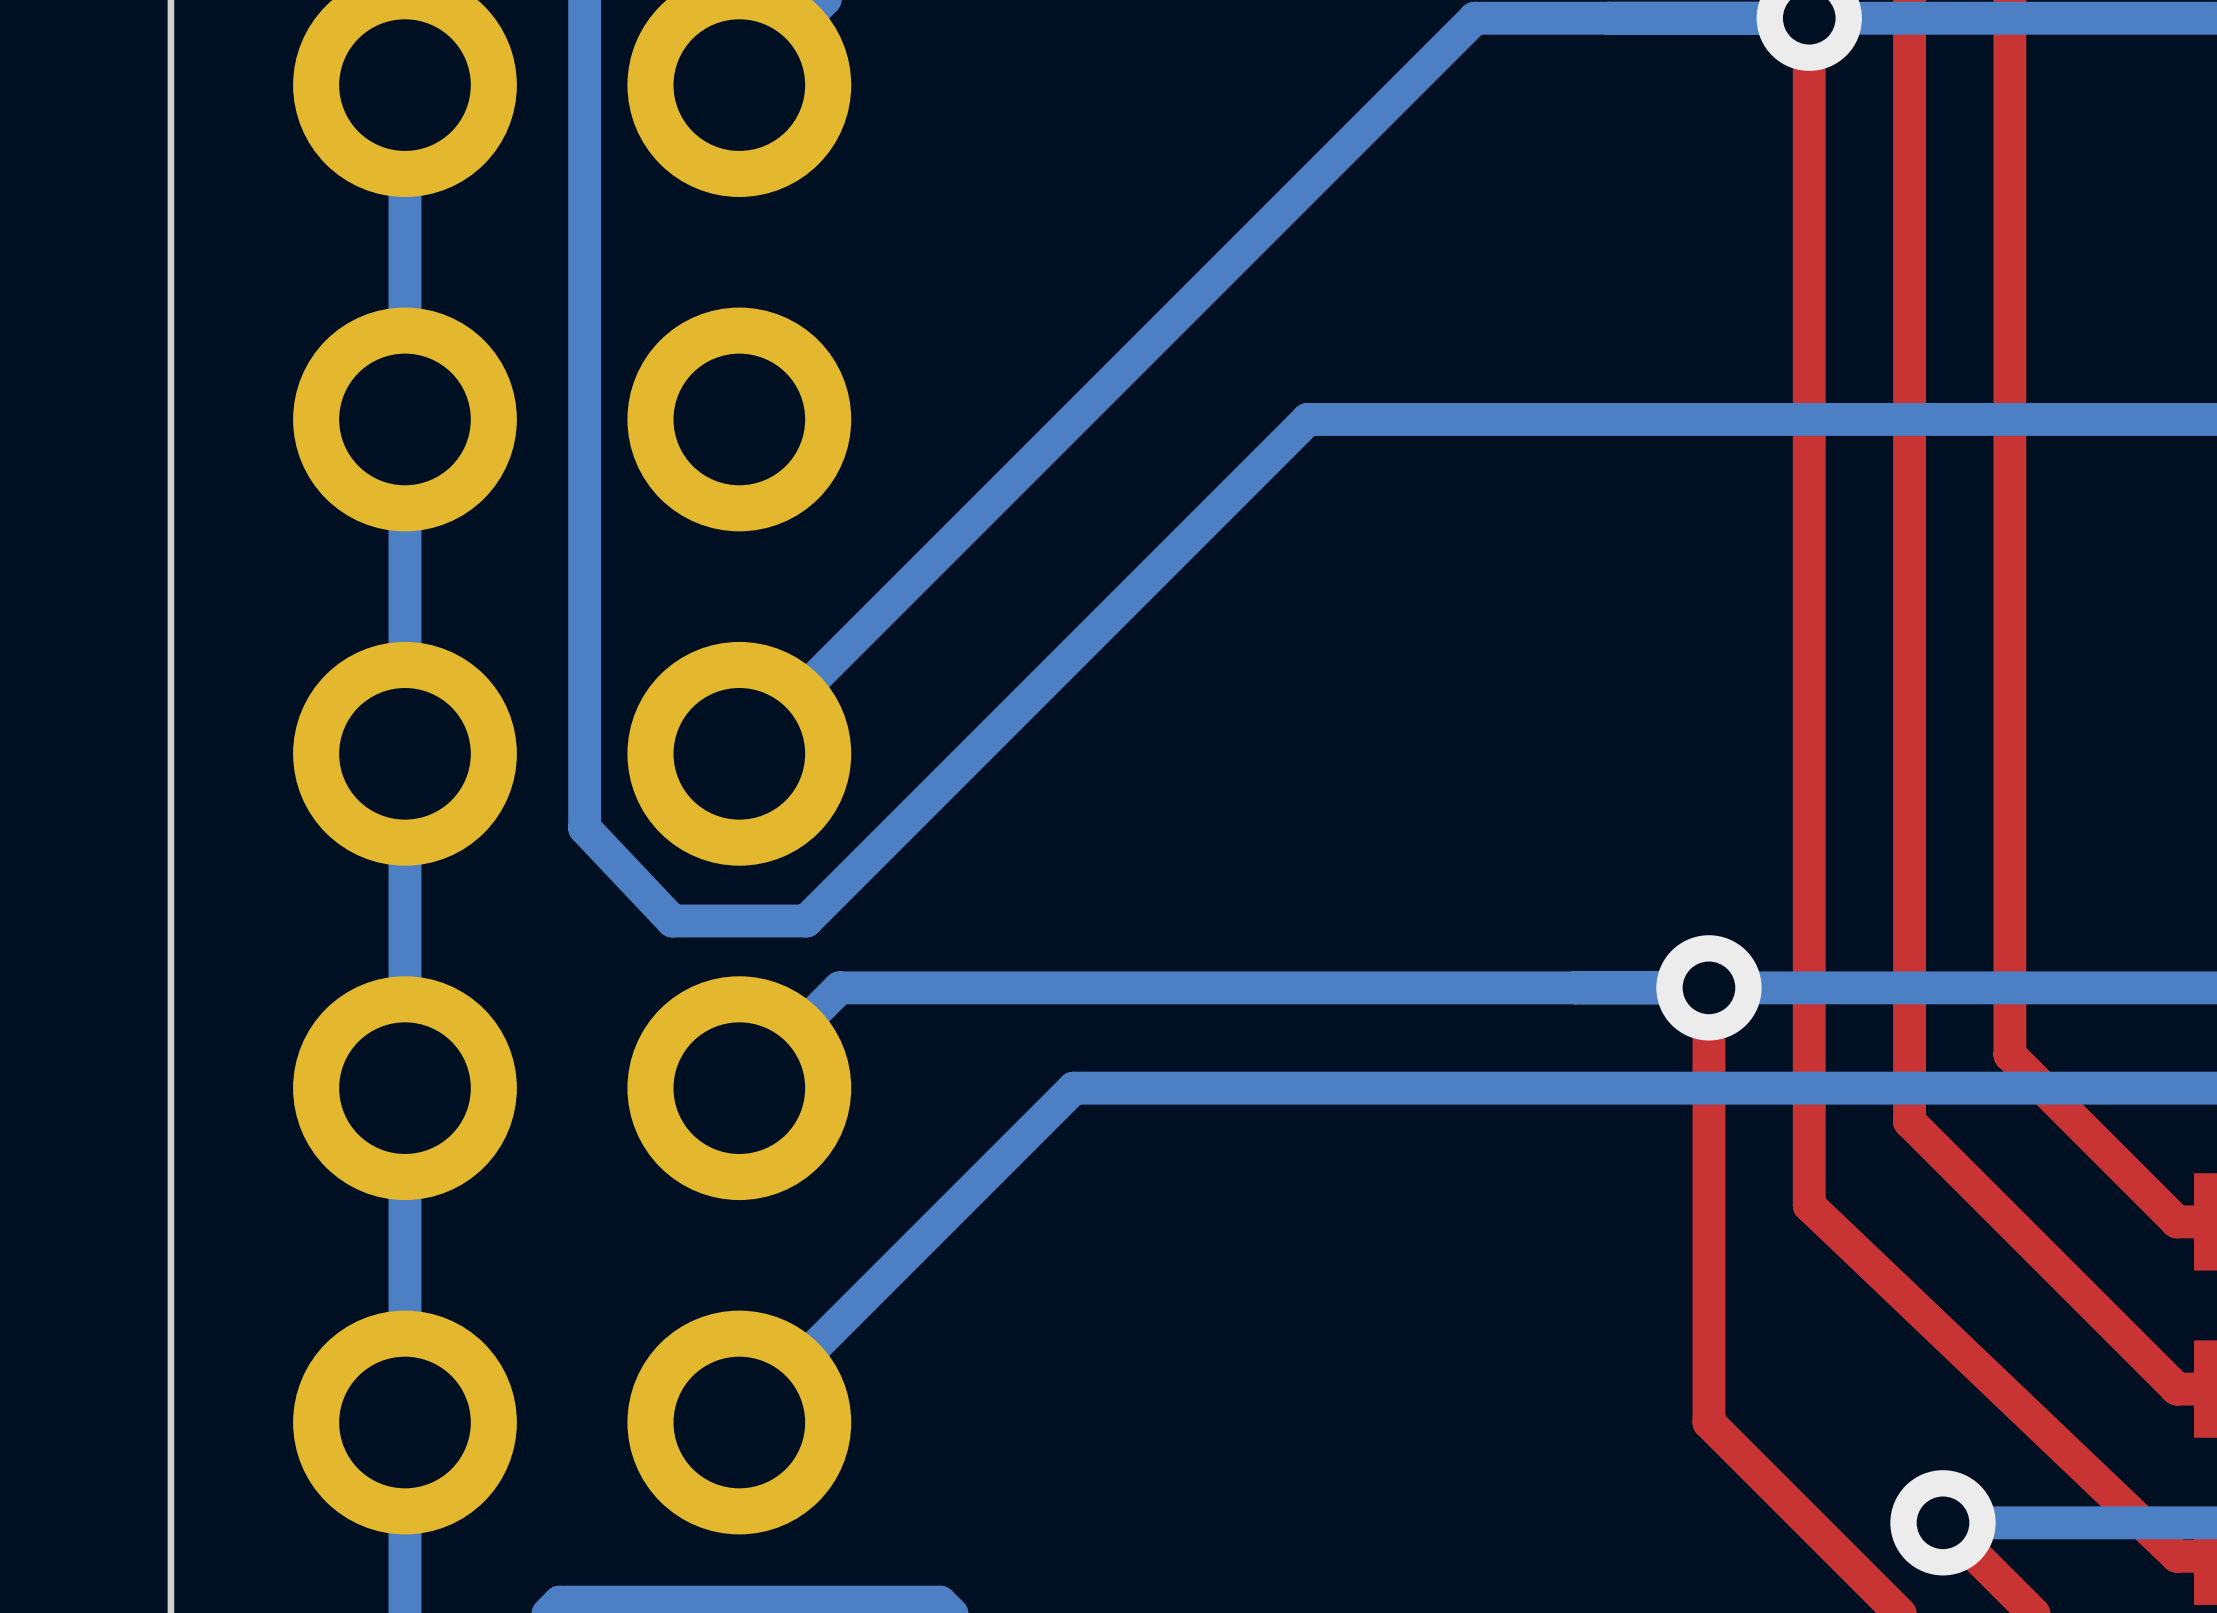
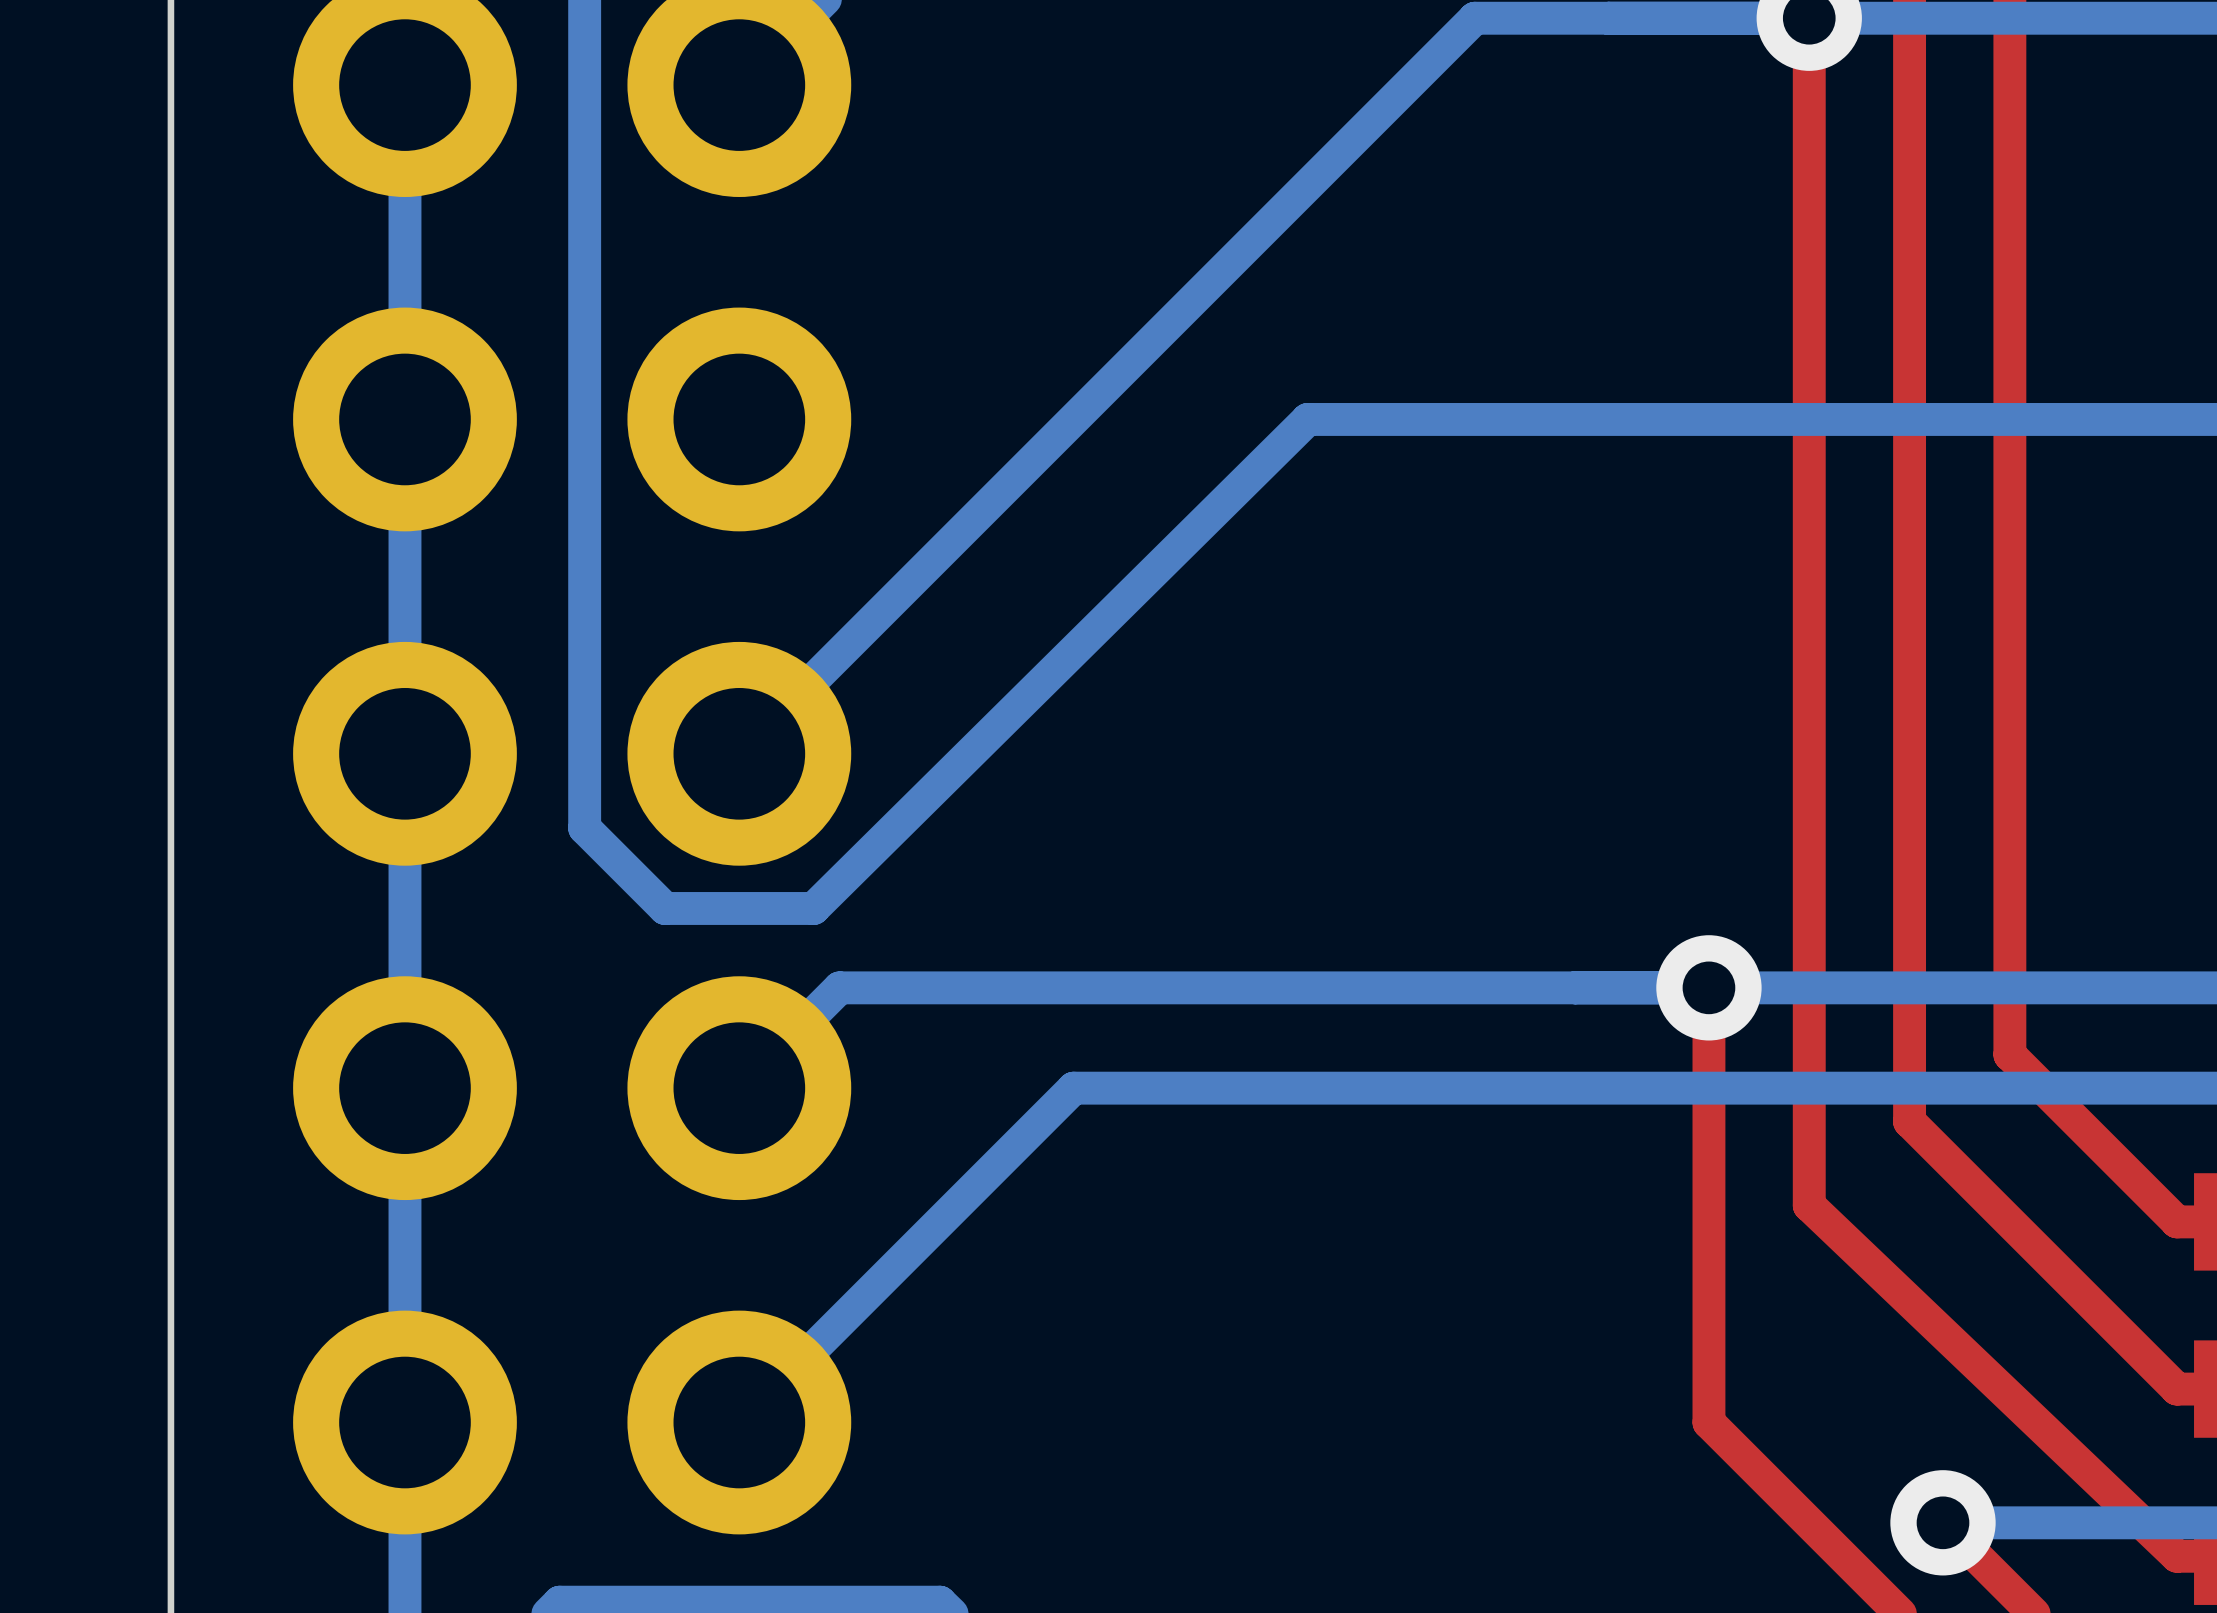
bottom track: (1307, 419) (806, 920) (672, 920) (584, 828) -> (1307, 419) (813, 908) (665, 908) (584, 828)

